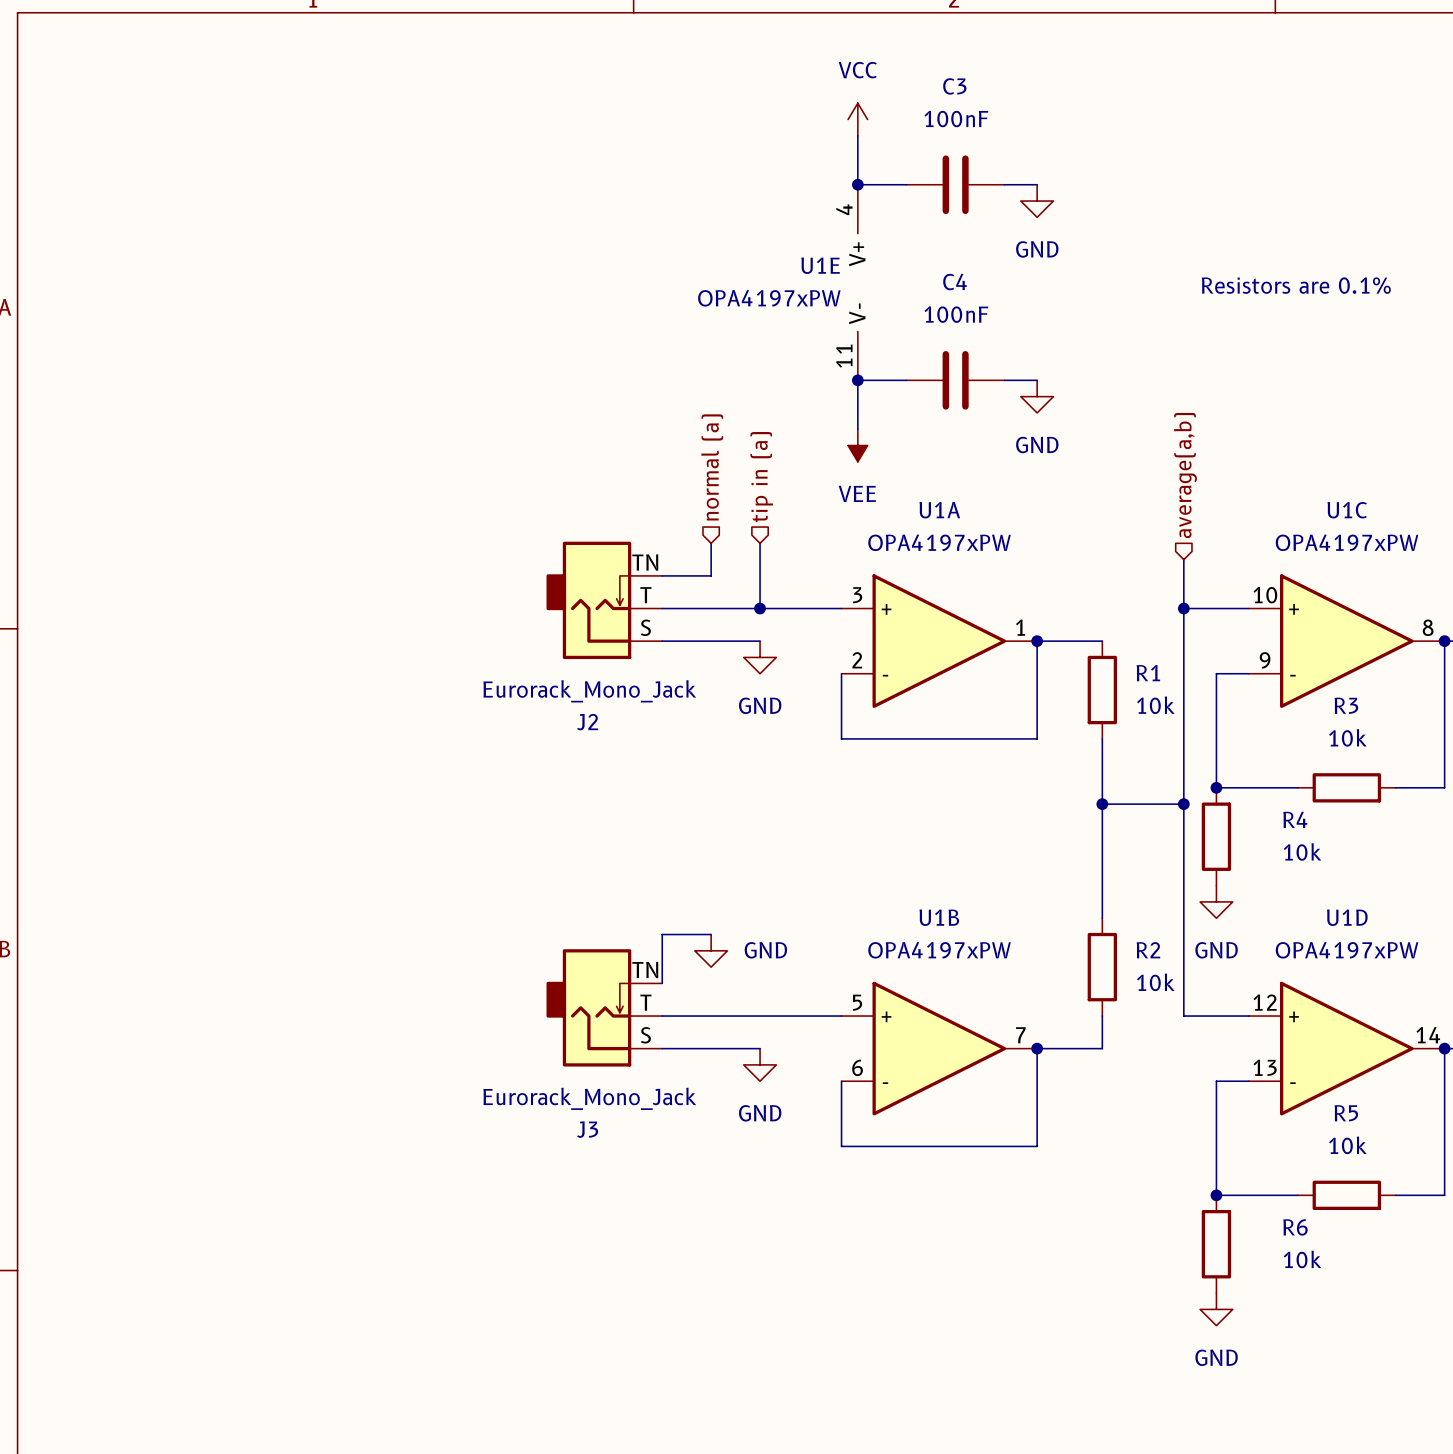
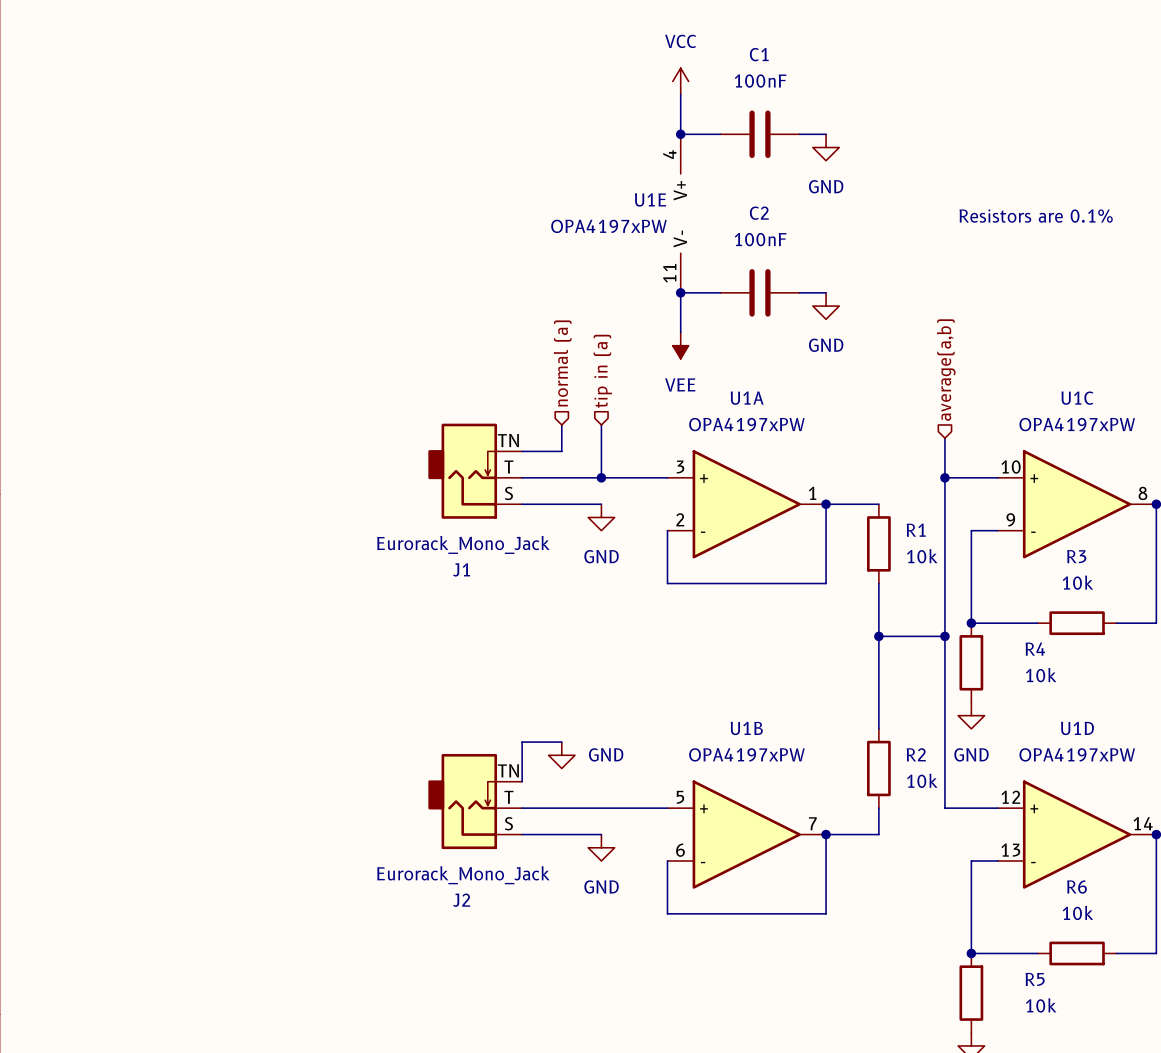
C3 name: C3 (954, 86) -> C1 (759, 54)
C4 name: C4 (955, 282) -> C2 (759, 213)
J2 name: J2 (587, 722) -> J1 (461, 569)
R5 name: R5 (1346, 1113) -> R6 (1076, 887)
J3 name: J3 (587, 1129) -> J2 (461, 900)
R6 name: R6 (1295, 1227) -> R5 (1035, 979)

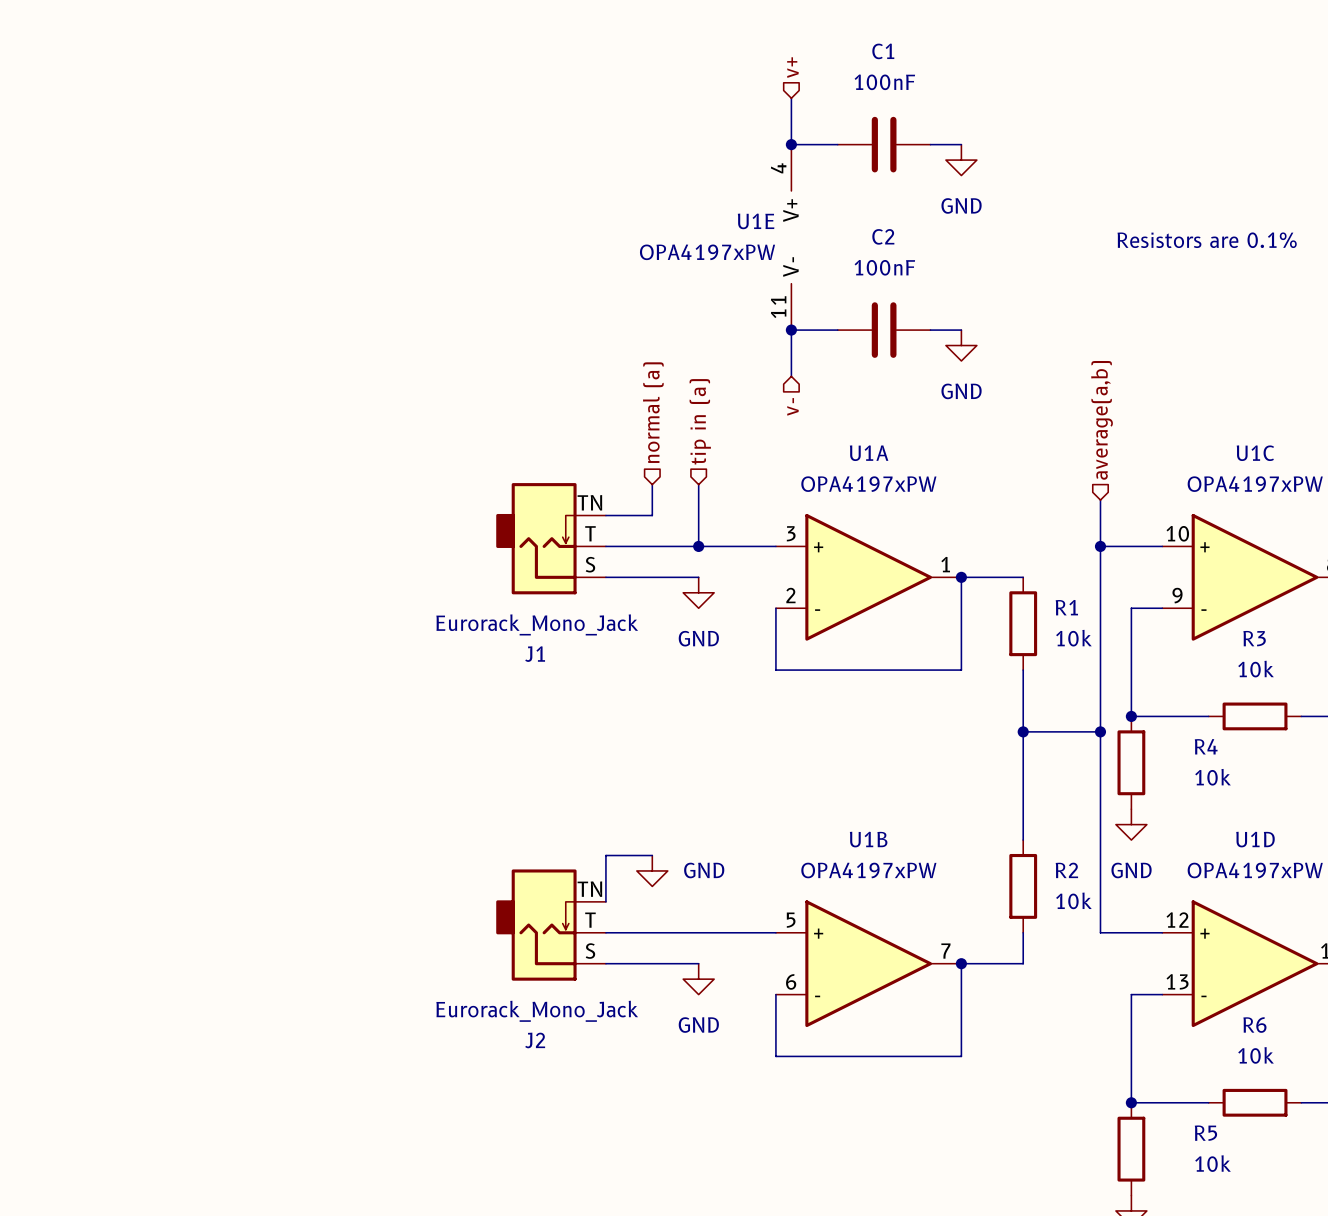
hierarchical label: none -> v+ (792, 67)
power symbol: VCC (680, 81) -> none
power symbol: VEE (680, 345) -> none
hierarchical label: none -> v- (792, 406)

